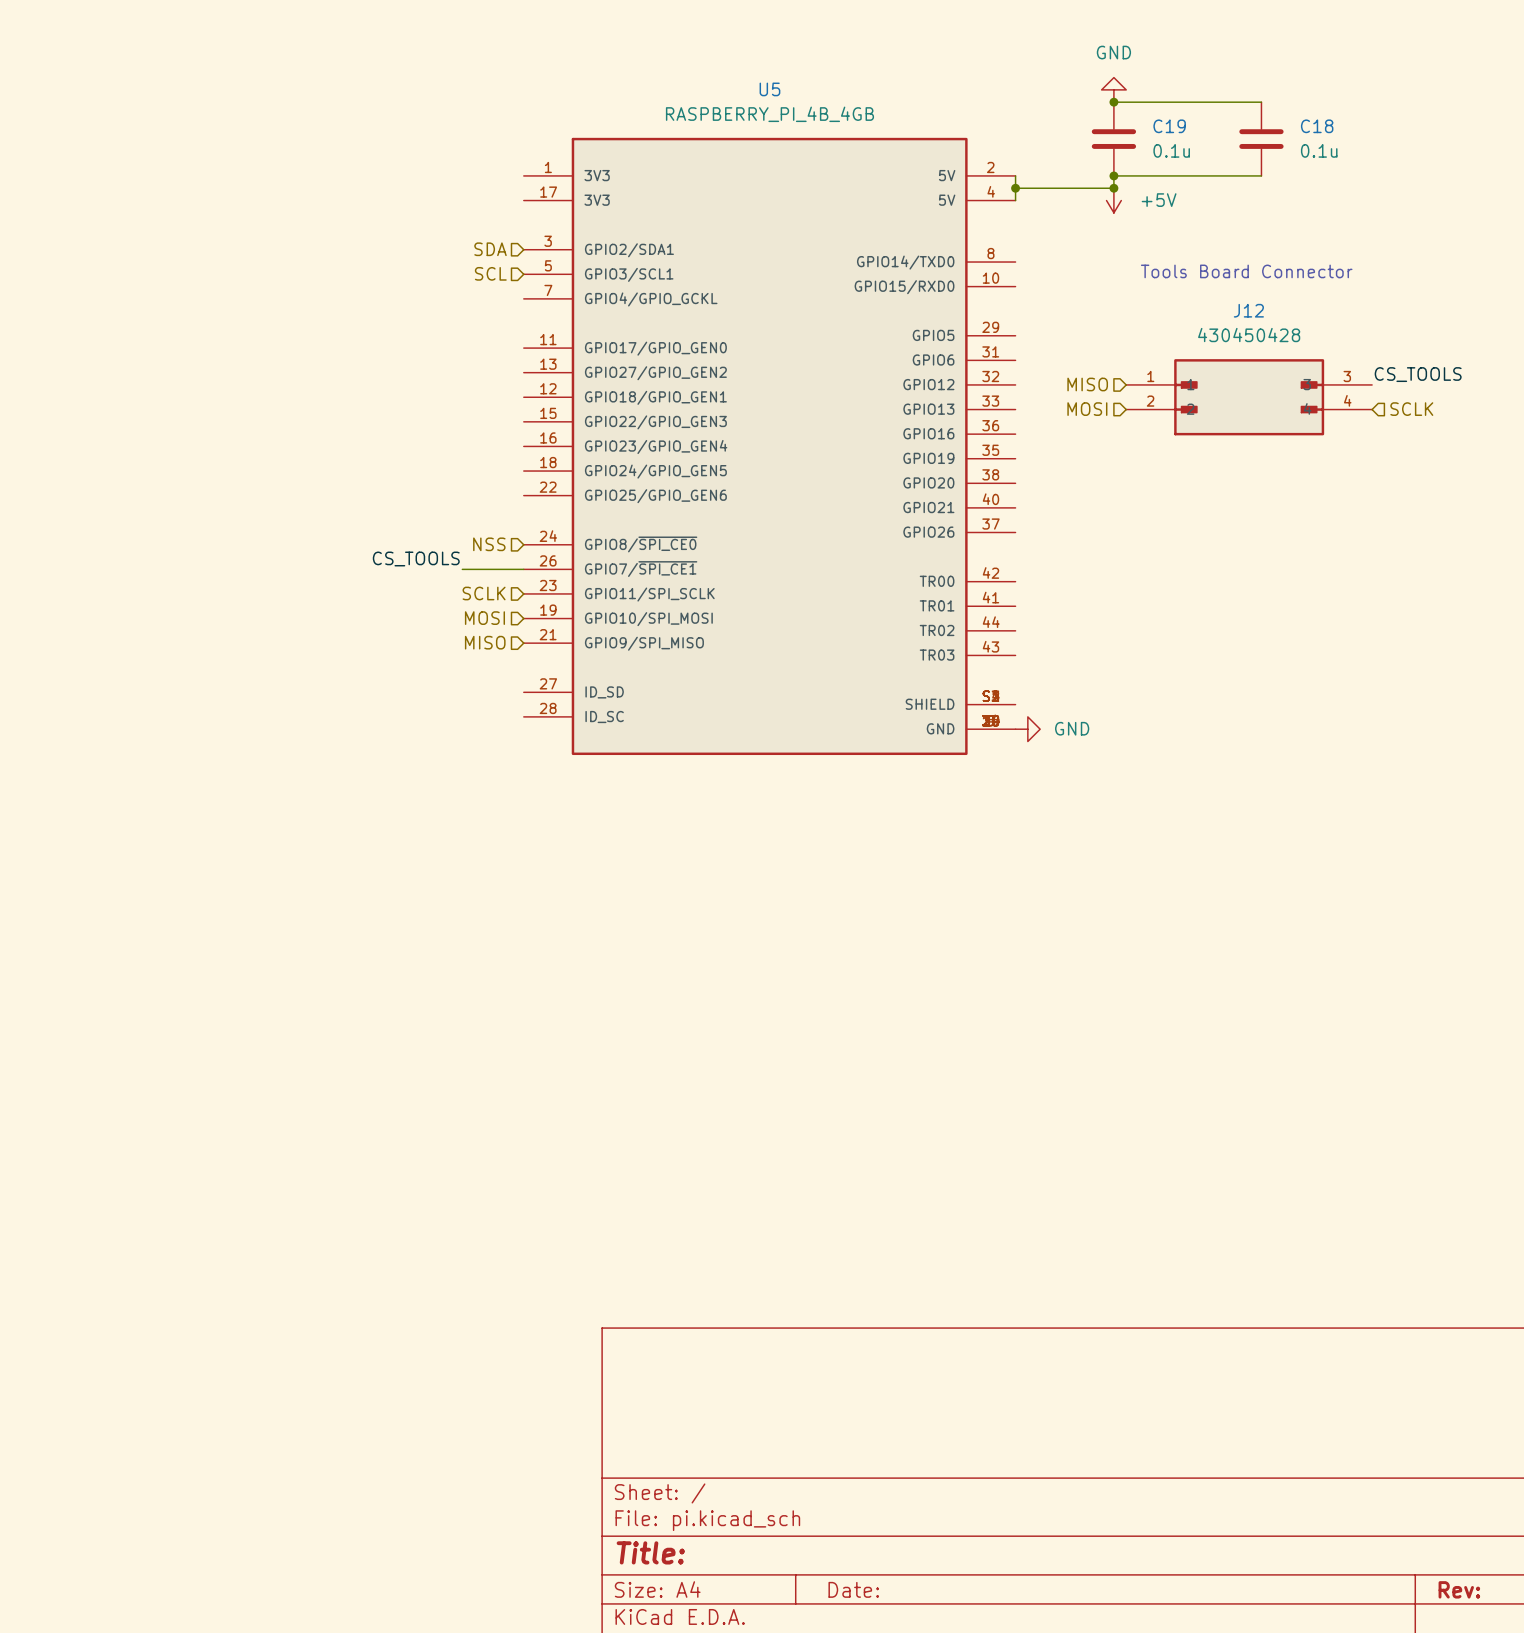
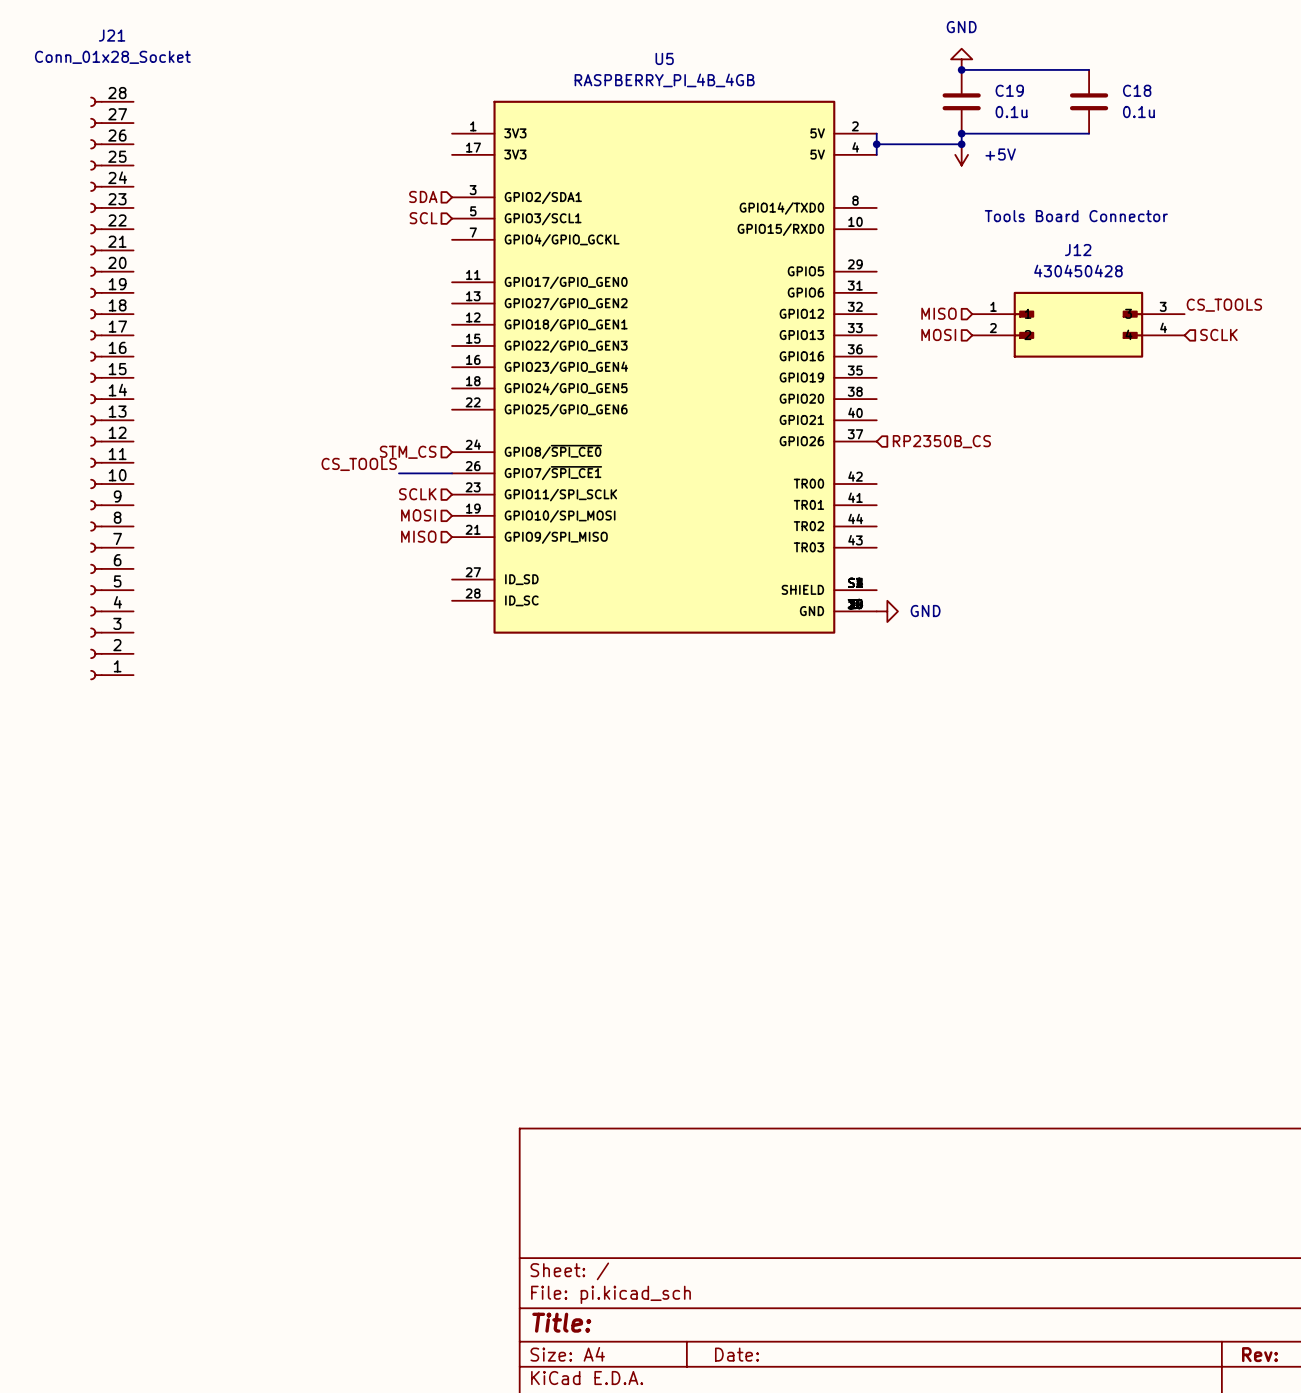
J21: none -> Conn_01x28_Socket (112, 388)
hierarchical label: none -> RP2350B_CS (941, 441)
hierarchical label: NSS (489, 544) -> STM_CS (408, 452)

